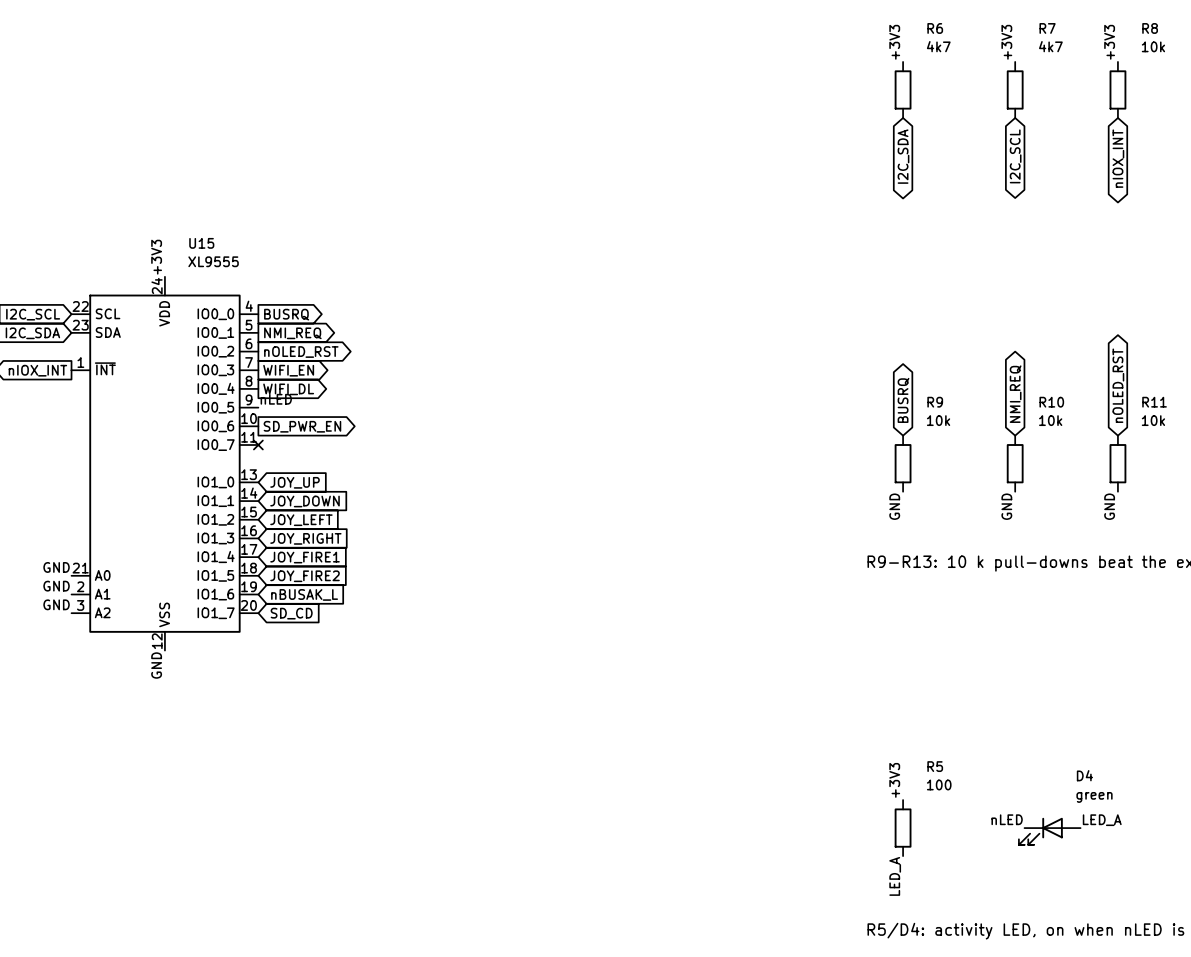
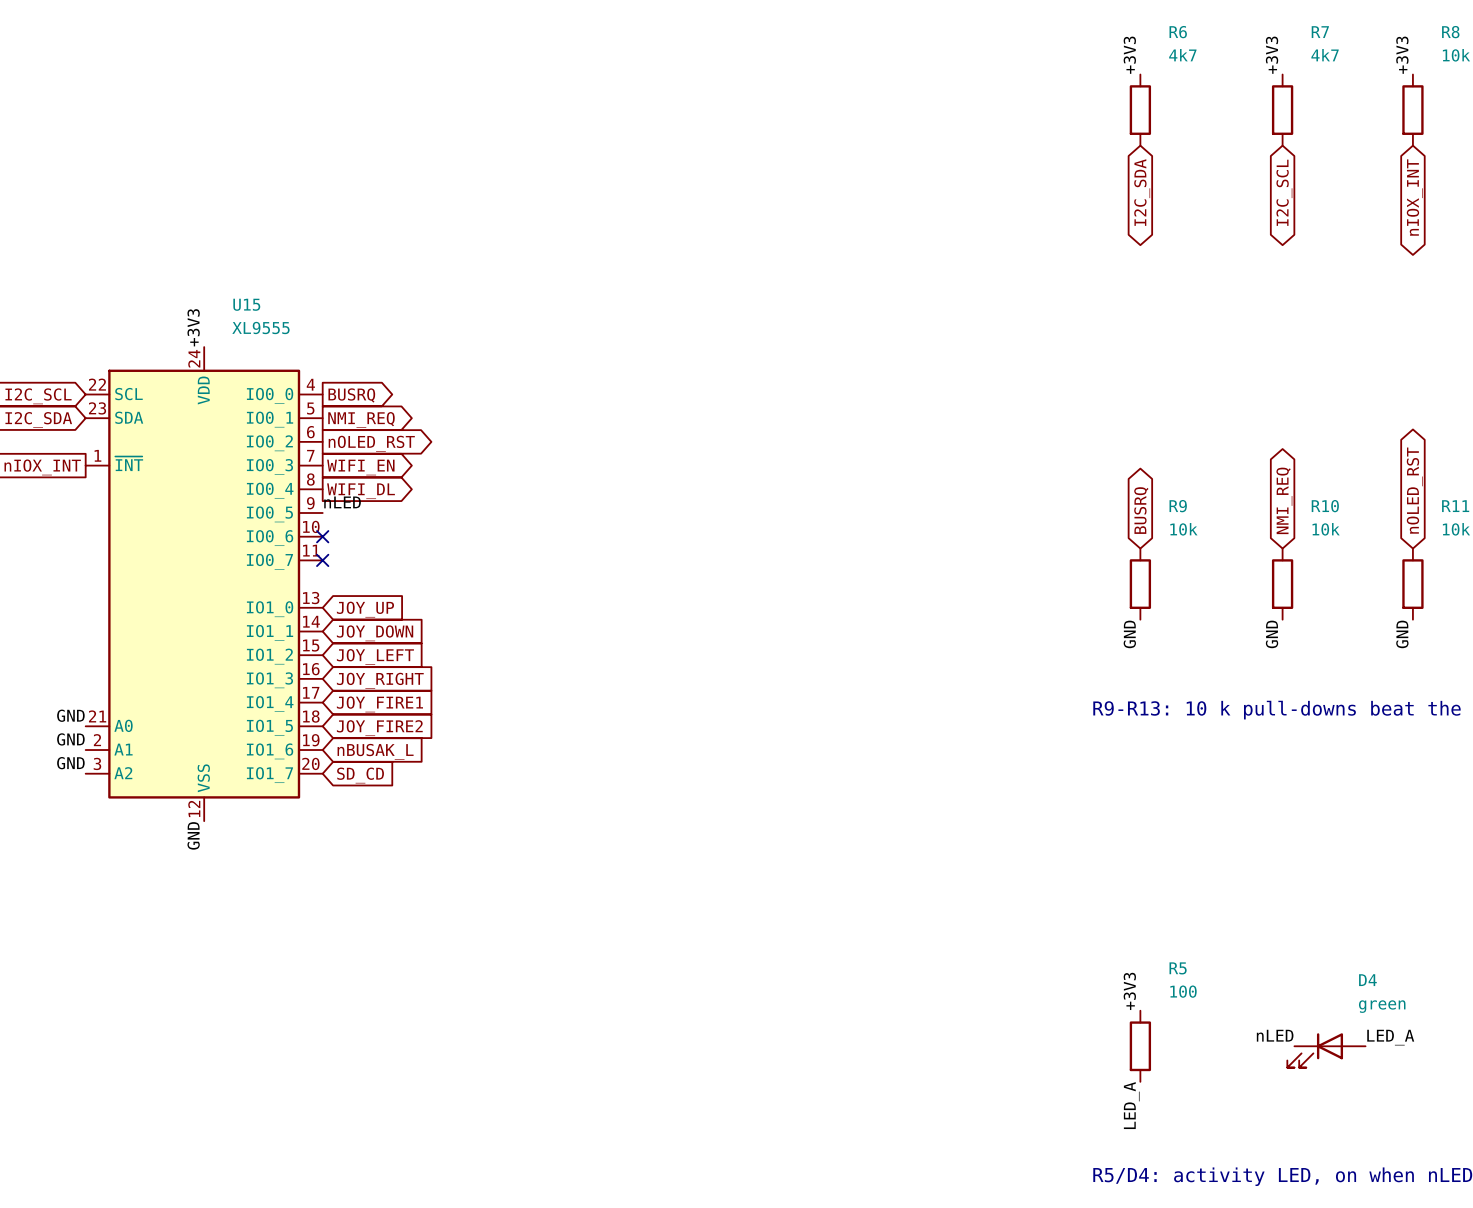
no-connect mark: none -> (322, 536)
global label: SD_PWR_EN (302, 426) -> none

